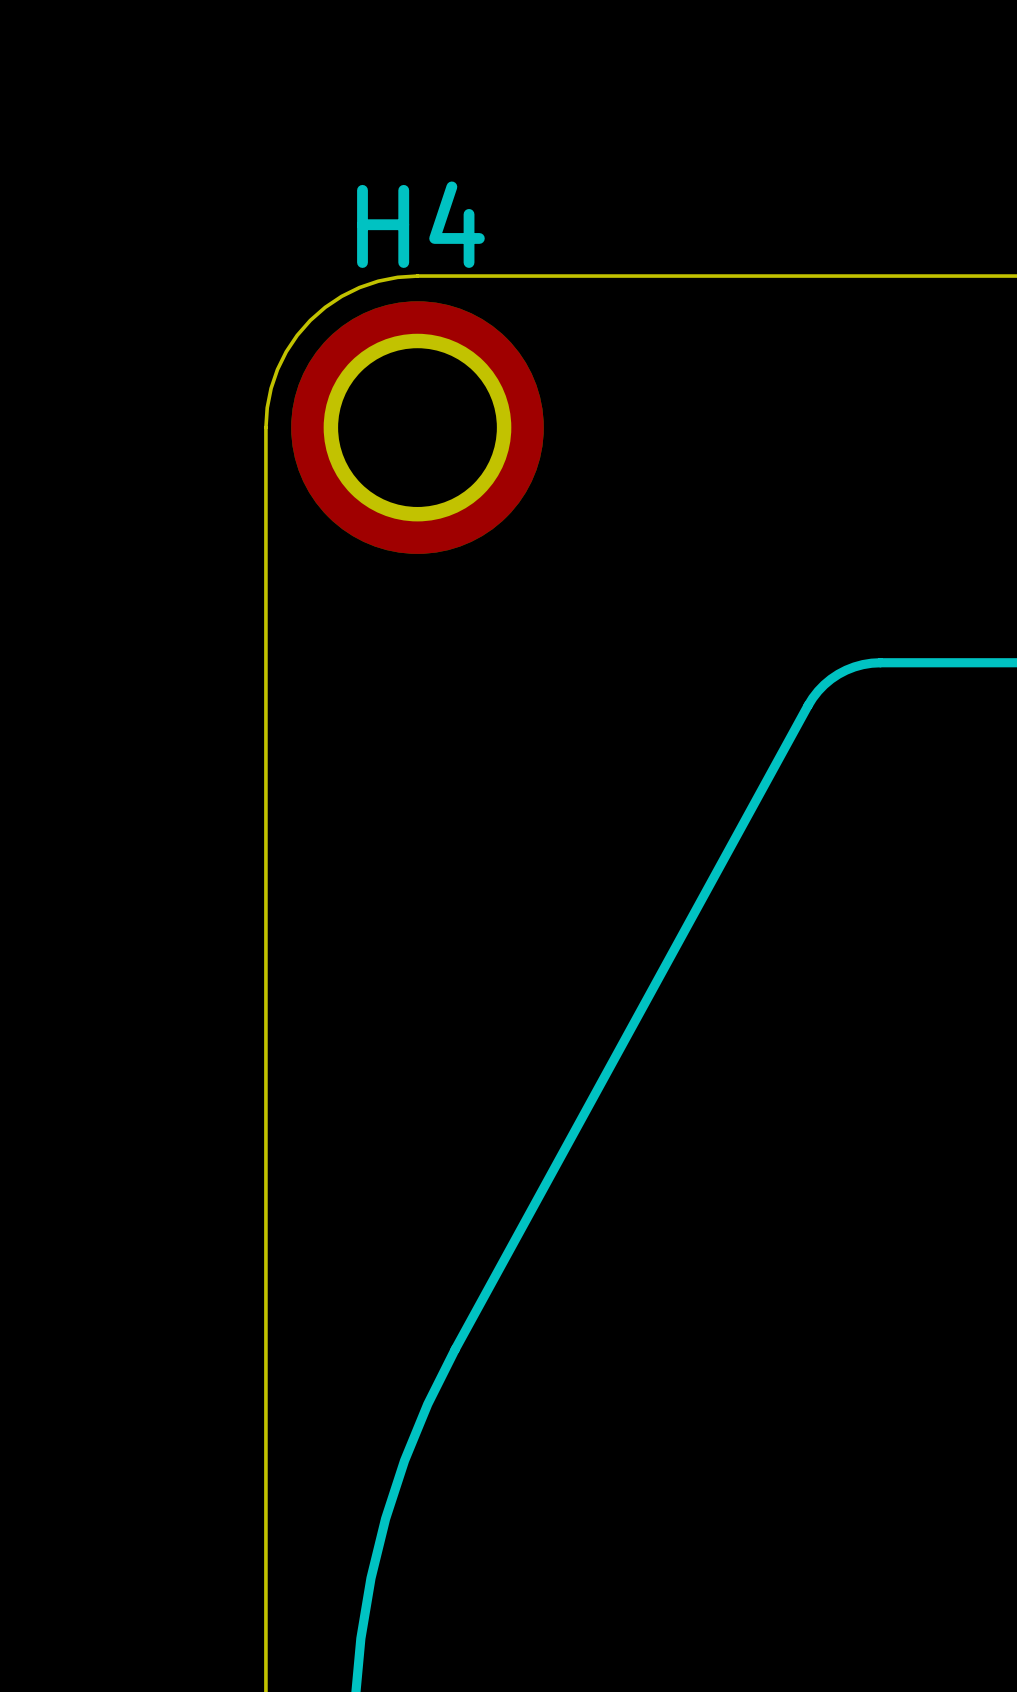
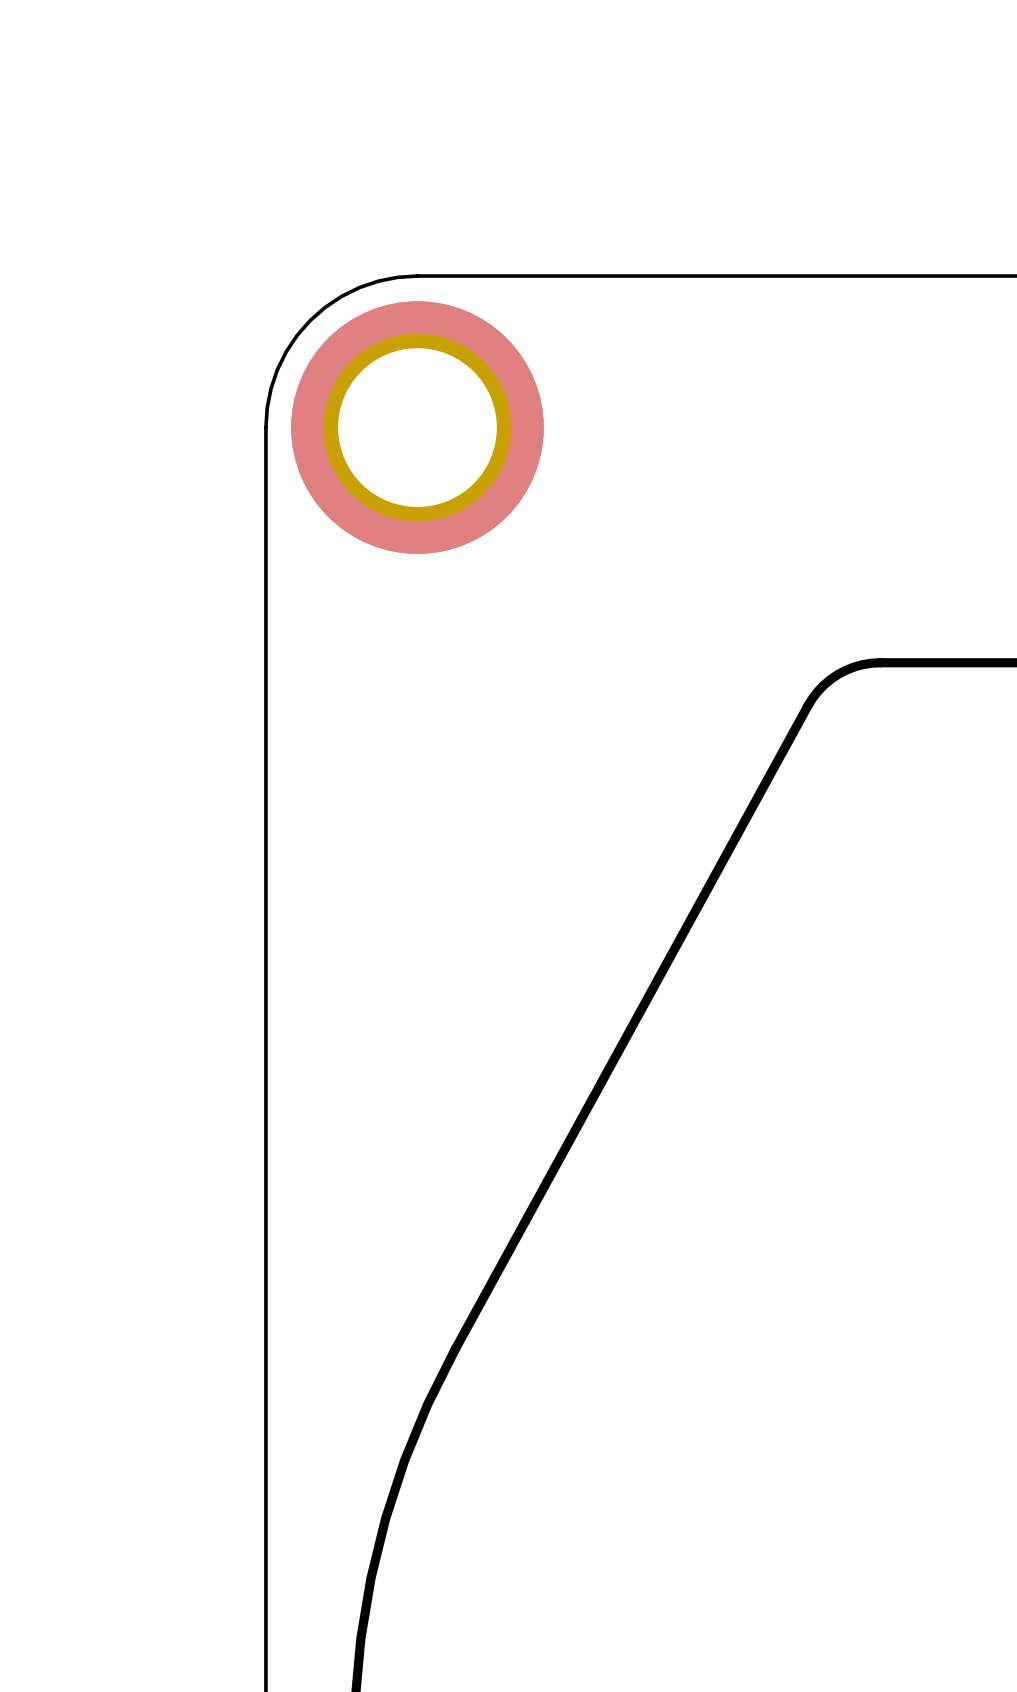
H4 name: H4 (420, 224) -> none

